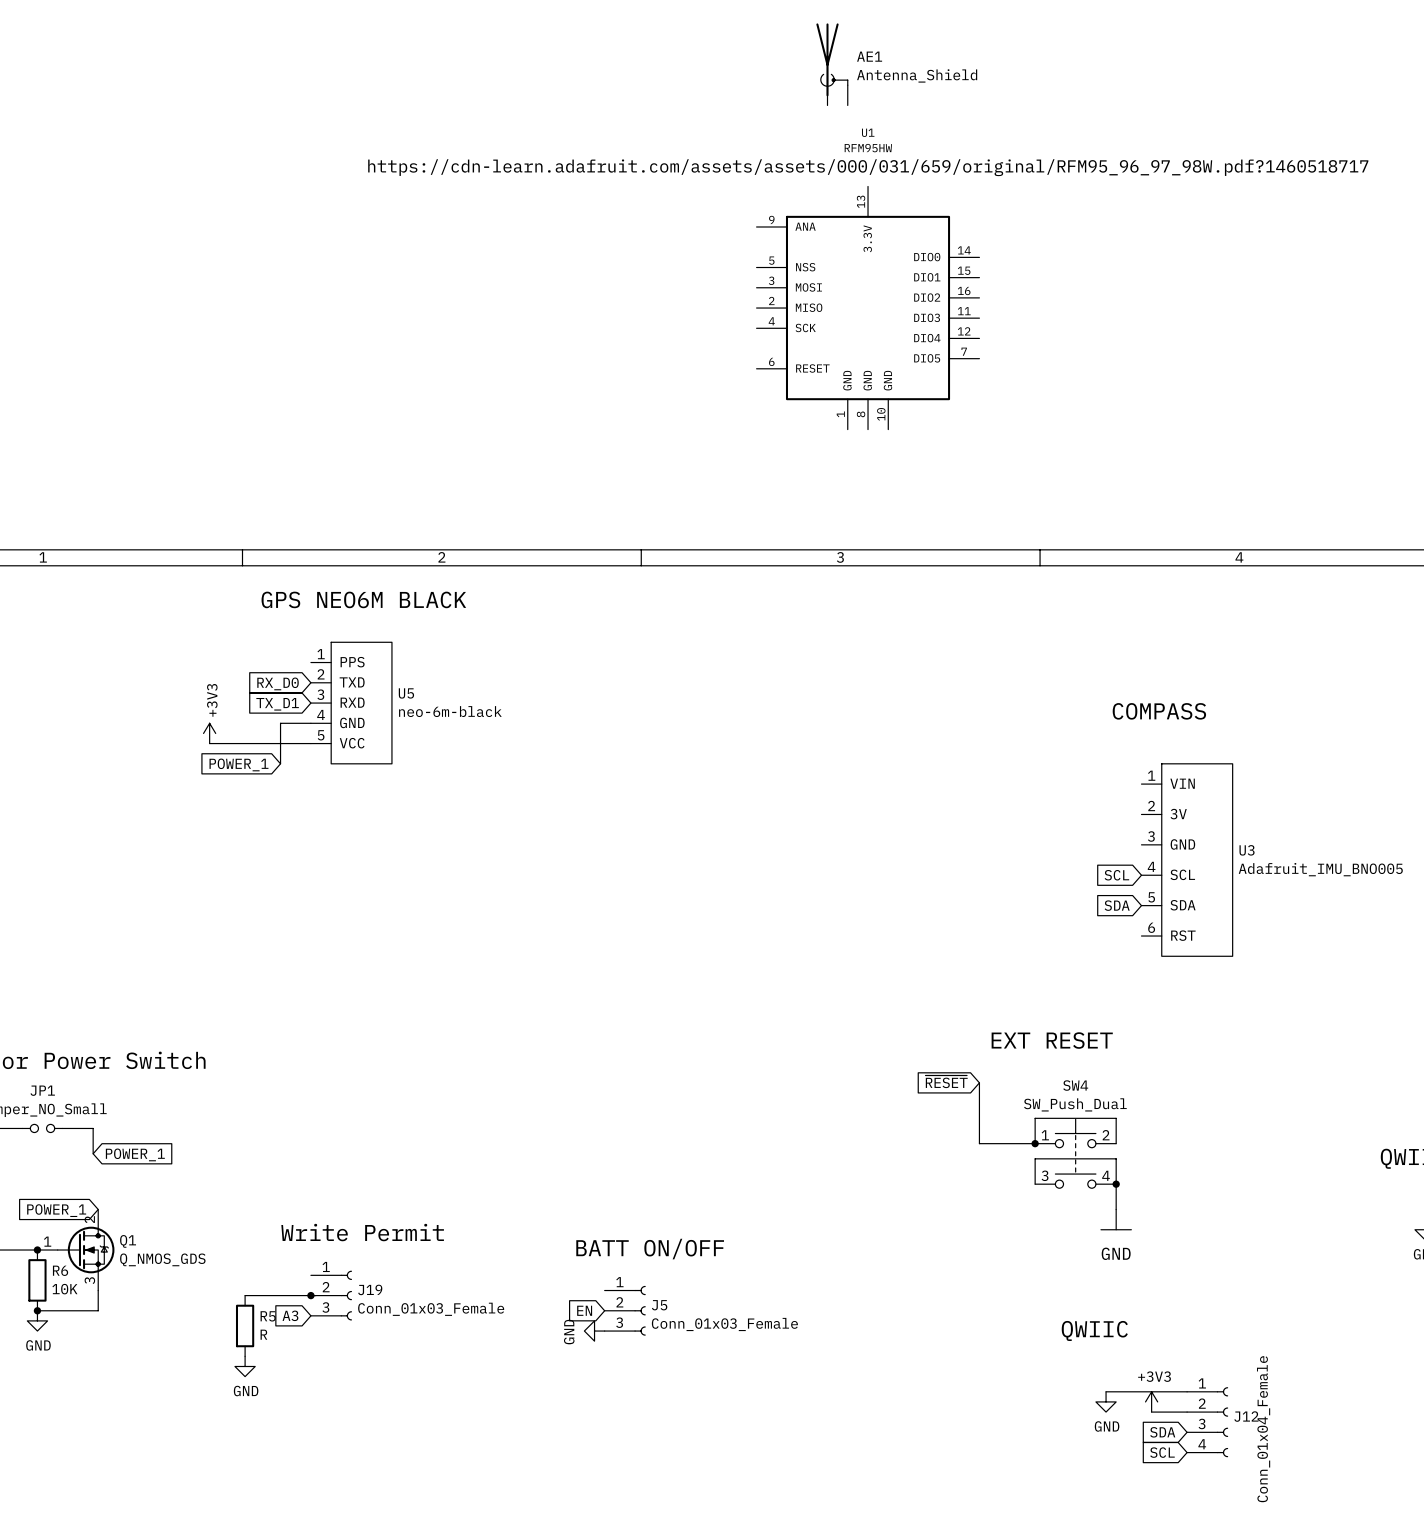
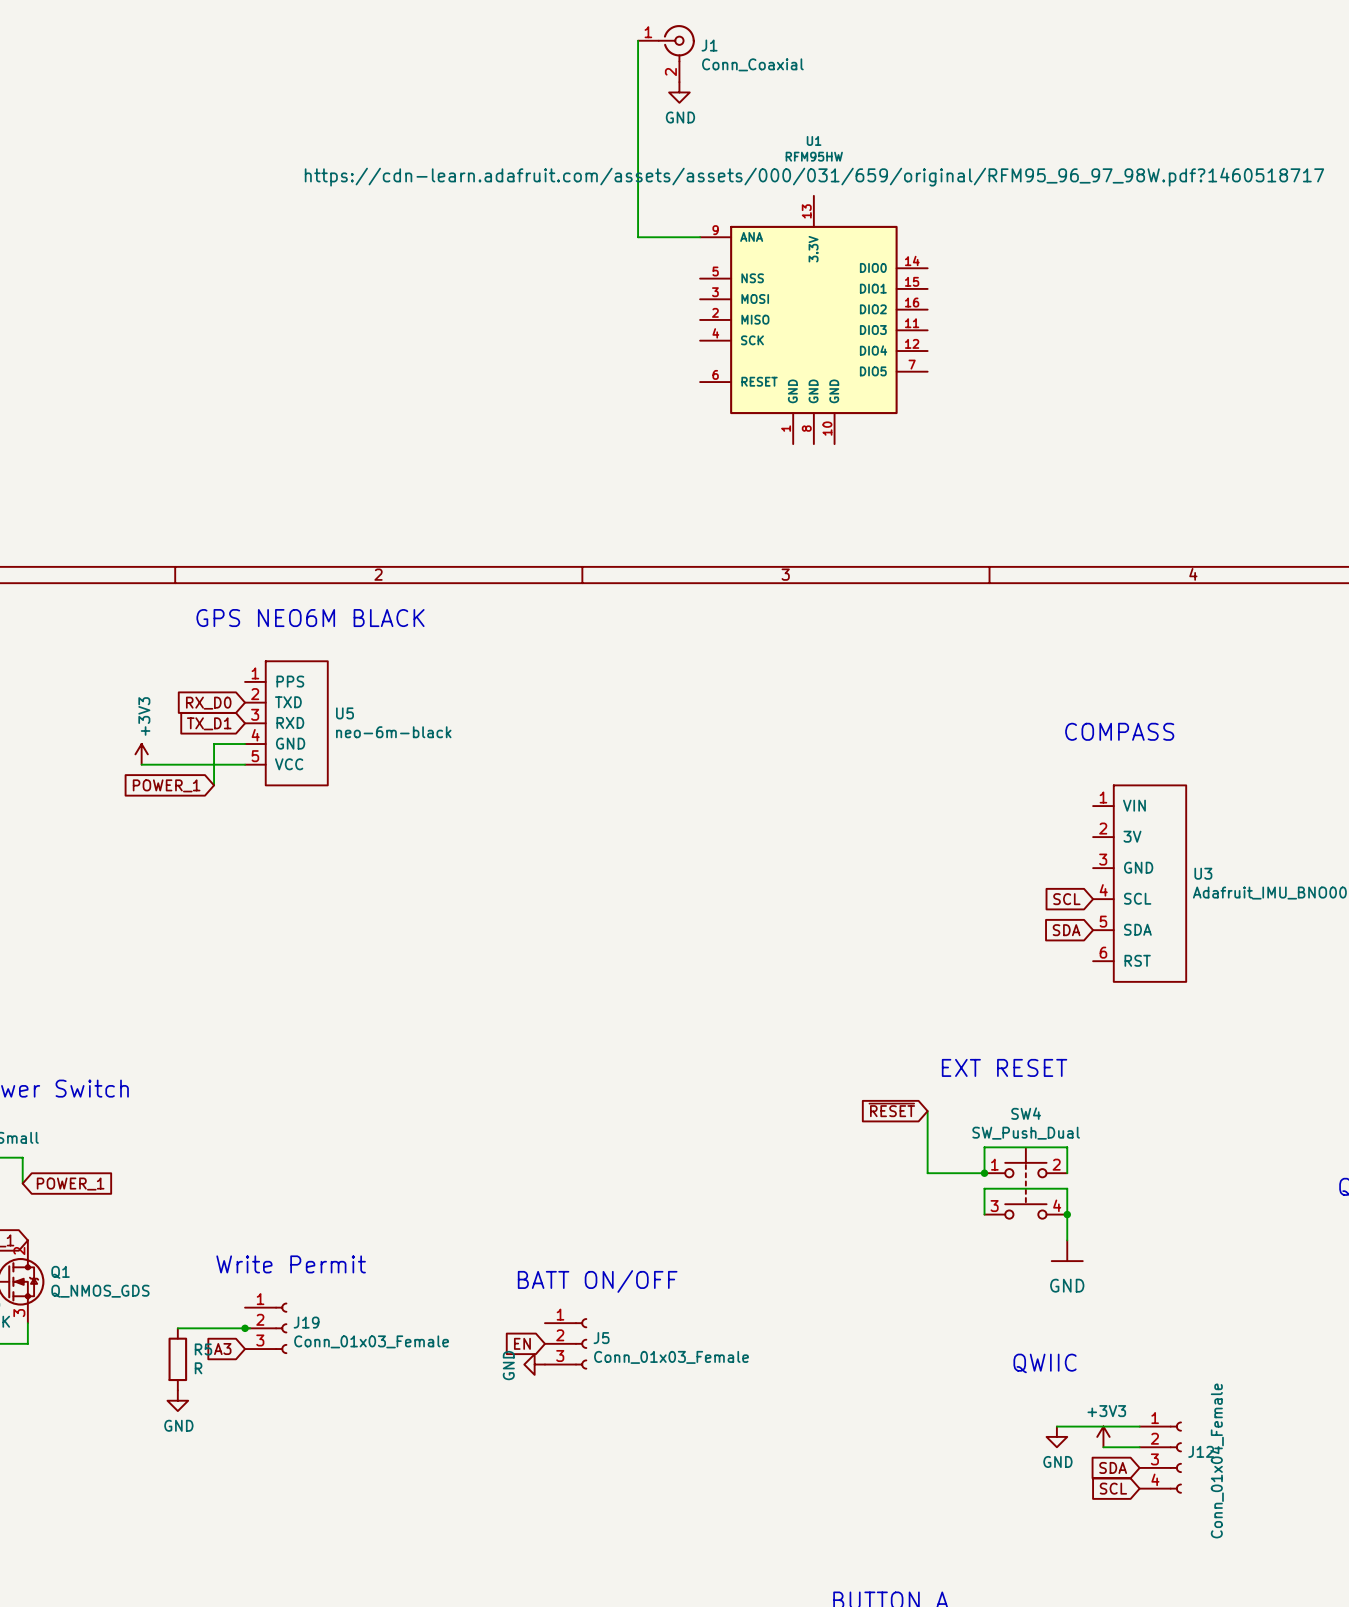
wire: none -> (638, 40) (638, 237) (700, 237)
J1: none -> Conn_Coaxial (666, 53)
AE1: Antenna_Shield (832, 64) -> none
power symbol: none -> GND (679, 92)

